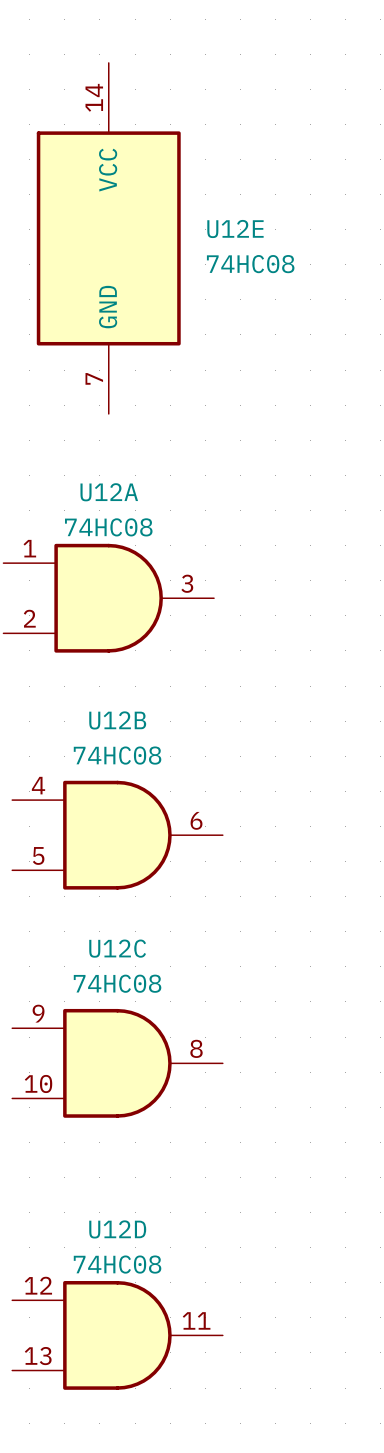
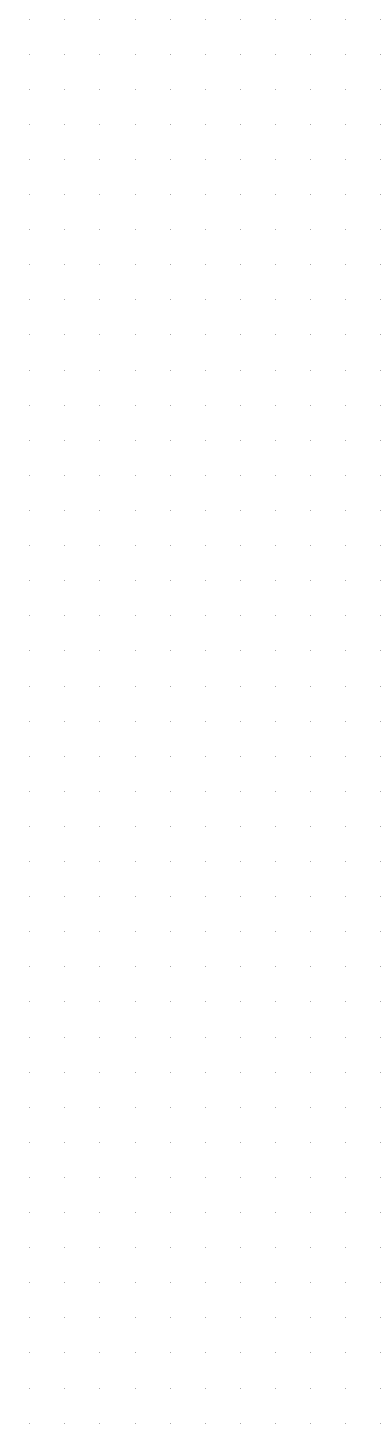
U12E: 74HC08 (108, 238) -> none
U12A: 74HC08 (108, 598) -> none
U12B: 74HC08 (117, 835) -> none
U12C: 74HC08 (117, 1063) -> none
U12D: 74HC08 (117, 1335) -> none

